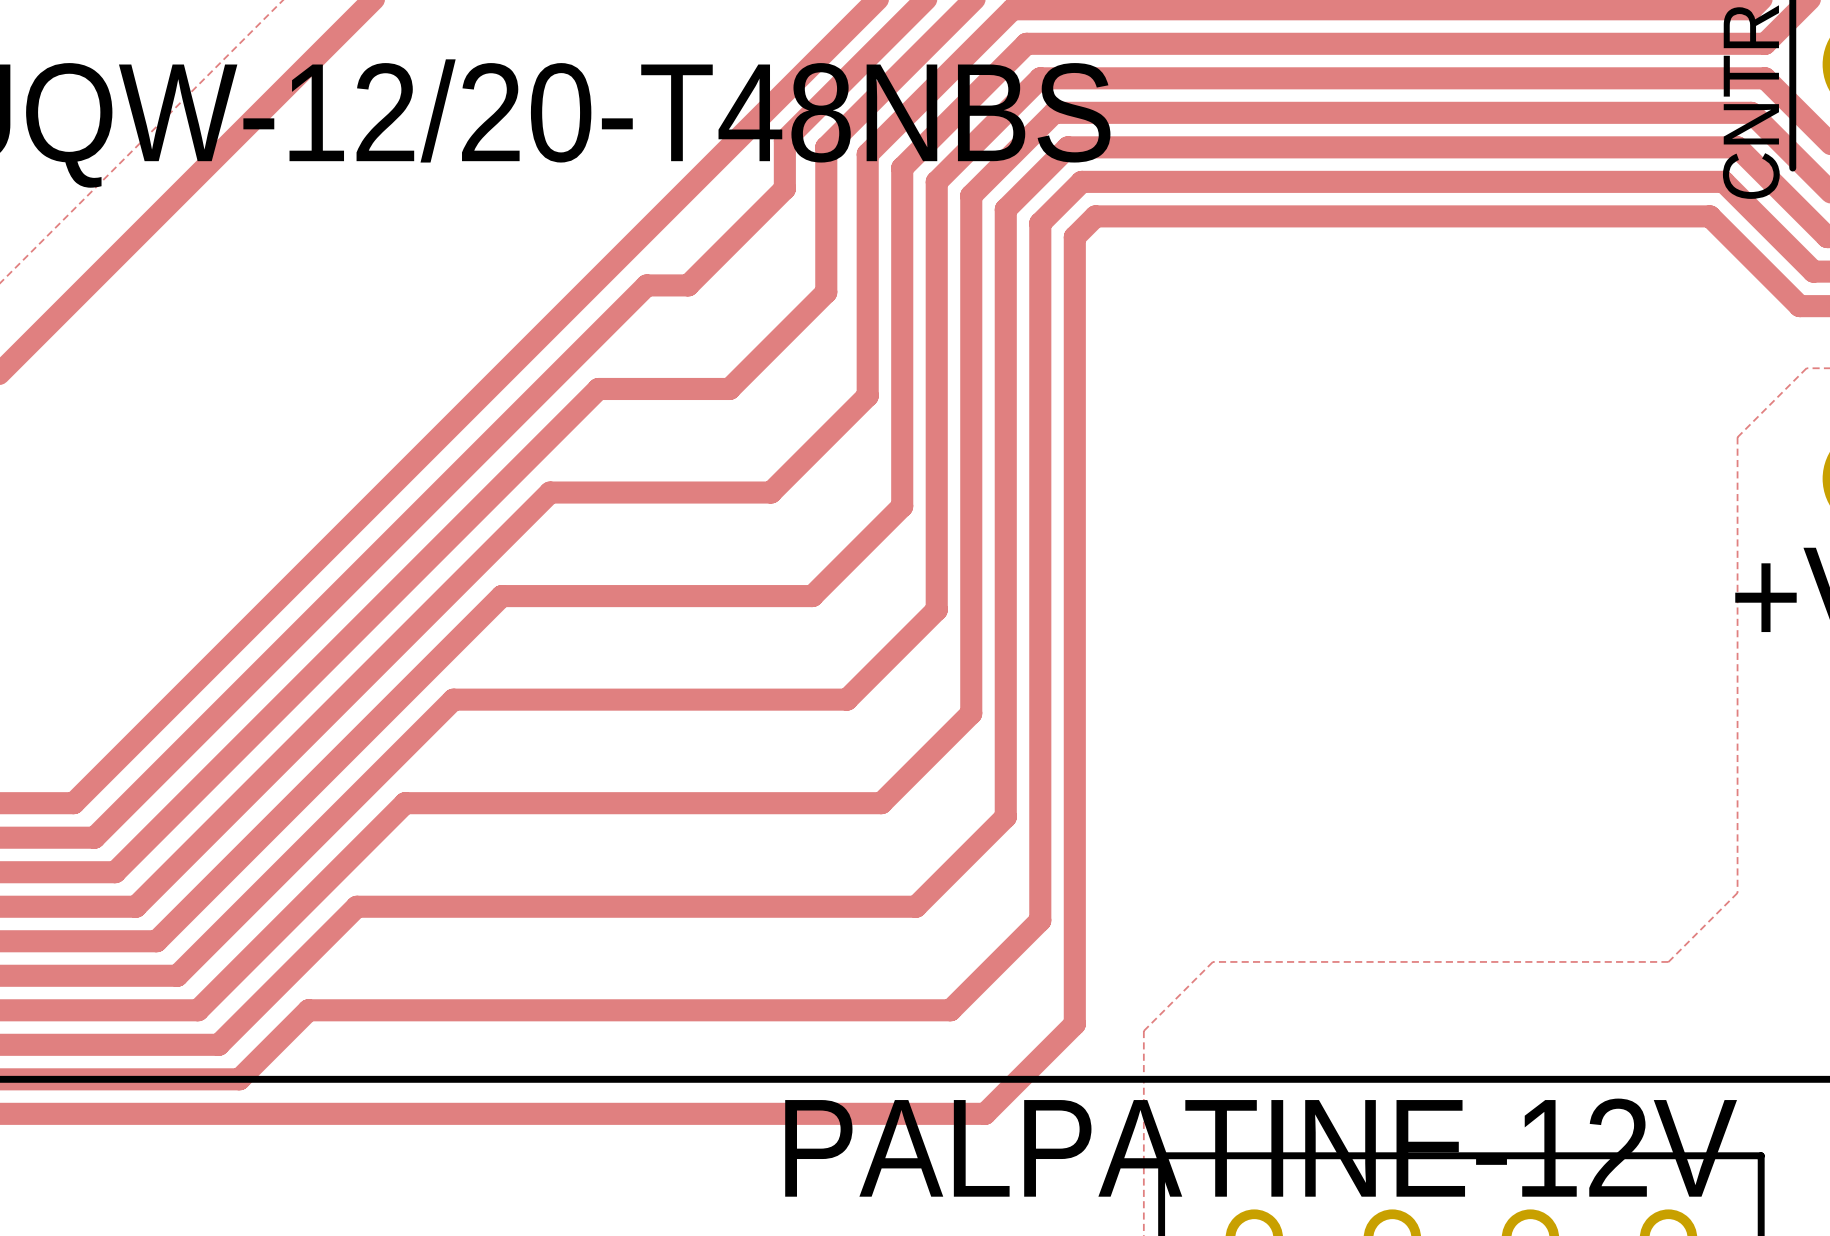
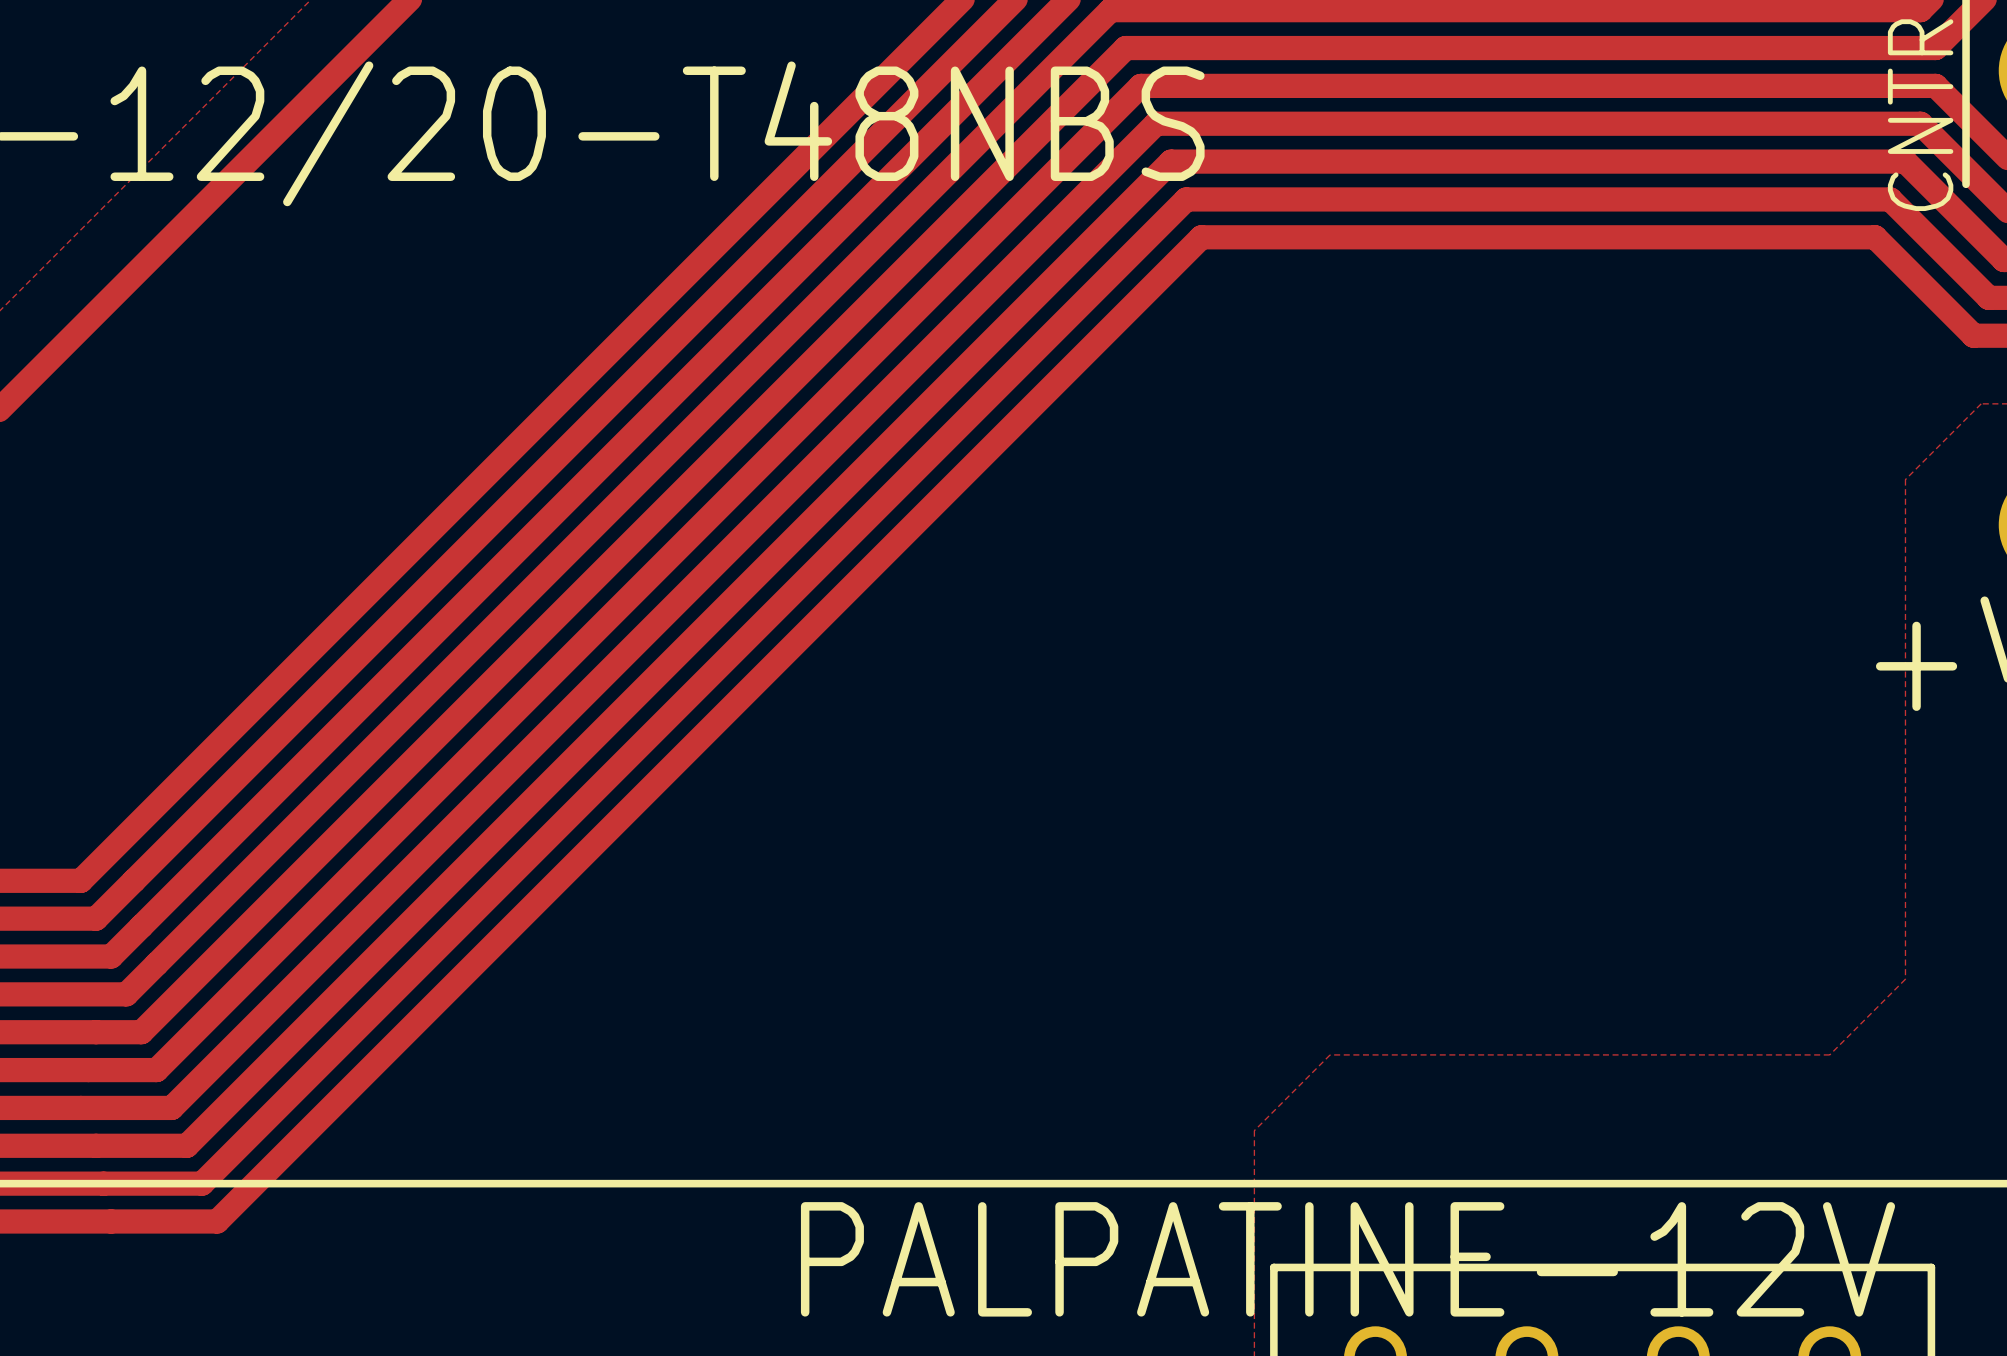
track: (784, 140) (784, 188) -> (906, 161) (860, 207)
track: none -> (860, 154) (96, 918)
track: (826, 147) (826, 292) -> (1027, 199) (906, 320)
track: (867, 154) (867, 395) -> (1140, 244) (951, 434)
track: none -> (951, 169) (126, 994)
track: (902, 168) (902, 506) (812, 596) (501, 596) (156, 941) (129, 941) -> (989, 184) (141, 1032)
track: (936, 181) (936, 609) (846, 699) (453, 699) (177, 975) (142, 975) -> none
track: (971, 195) (971, 713) (881, 803) (405, 803) (198, 1010) (156, 1010) -> (1065, 214) (171, 1107)
track: (1005, 209) (1005, 816) (916, 906) (356, 906) -> (1102, 229) (186, 1145)
track: (1040, 223) (1040, 920) (950, 1010) (308, 1010) (239, 1079) (184, 1079) -> none
track: (1074, 237) (1074, 1024) (985, 1113) (198, 1113) -> (1178, 260) (217, 1221)
track: (688, 285) (646, 285) (94, 837) (87, 837) -> (754, 313) (111, 956)
track: (729, 388) (598, 388) (115, 872) (101, 872) -> (800, 426) (156, 1070)
track: (771, 492) (550, 492) (135, 906) (115, 906) -> (845, 540) (391, 994)
track: (170, 1044) (218, 1044) -> (202, 1183) (239, 1145)

